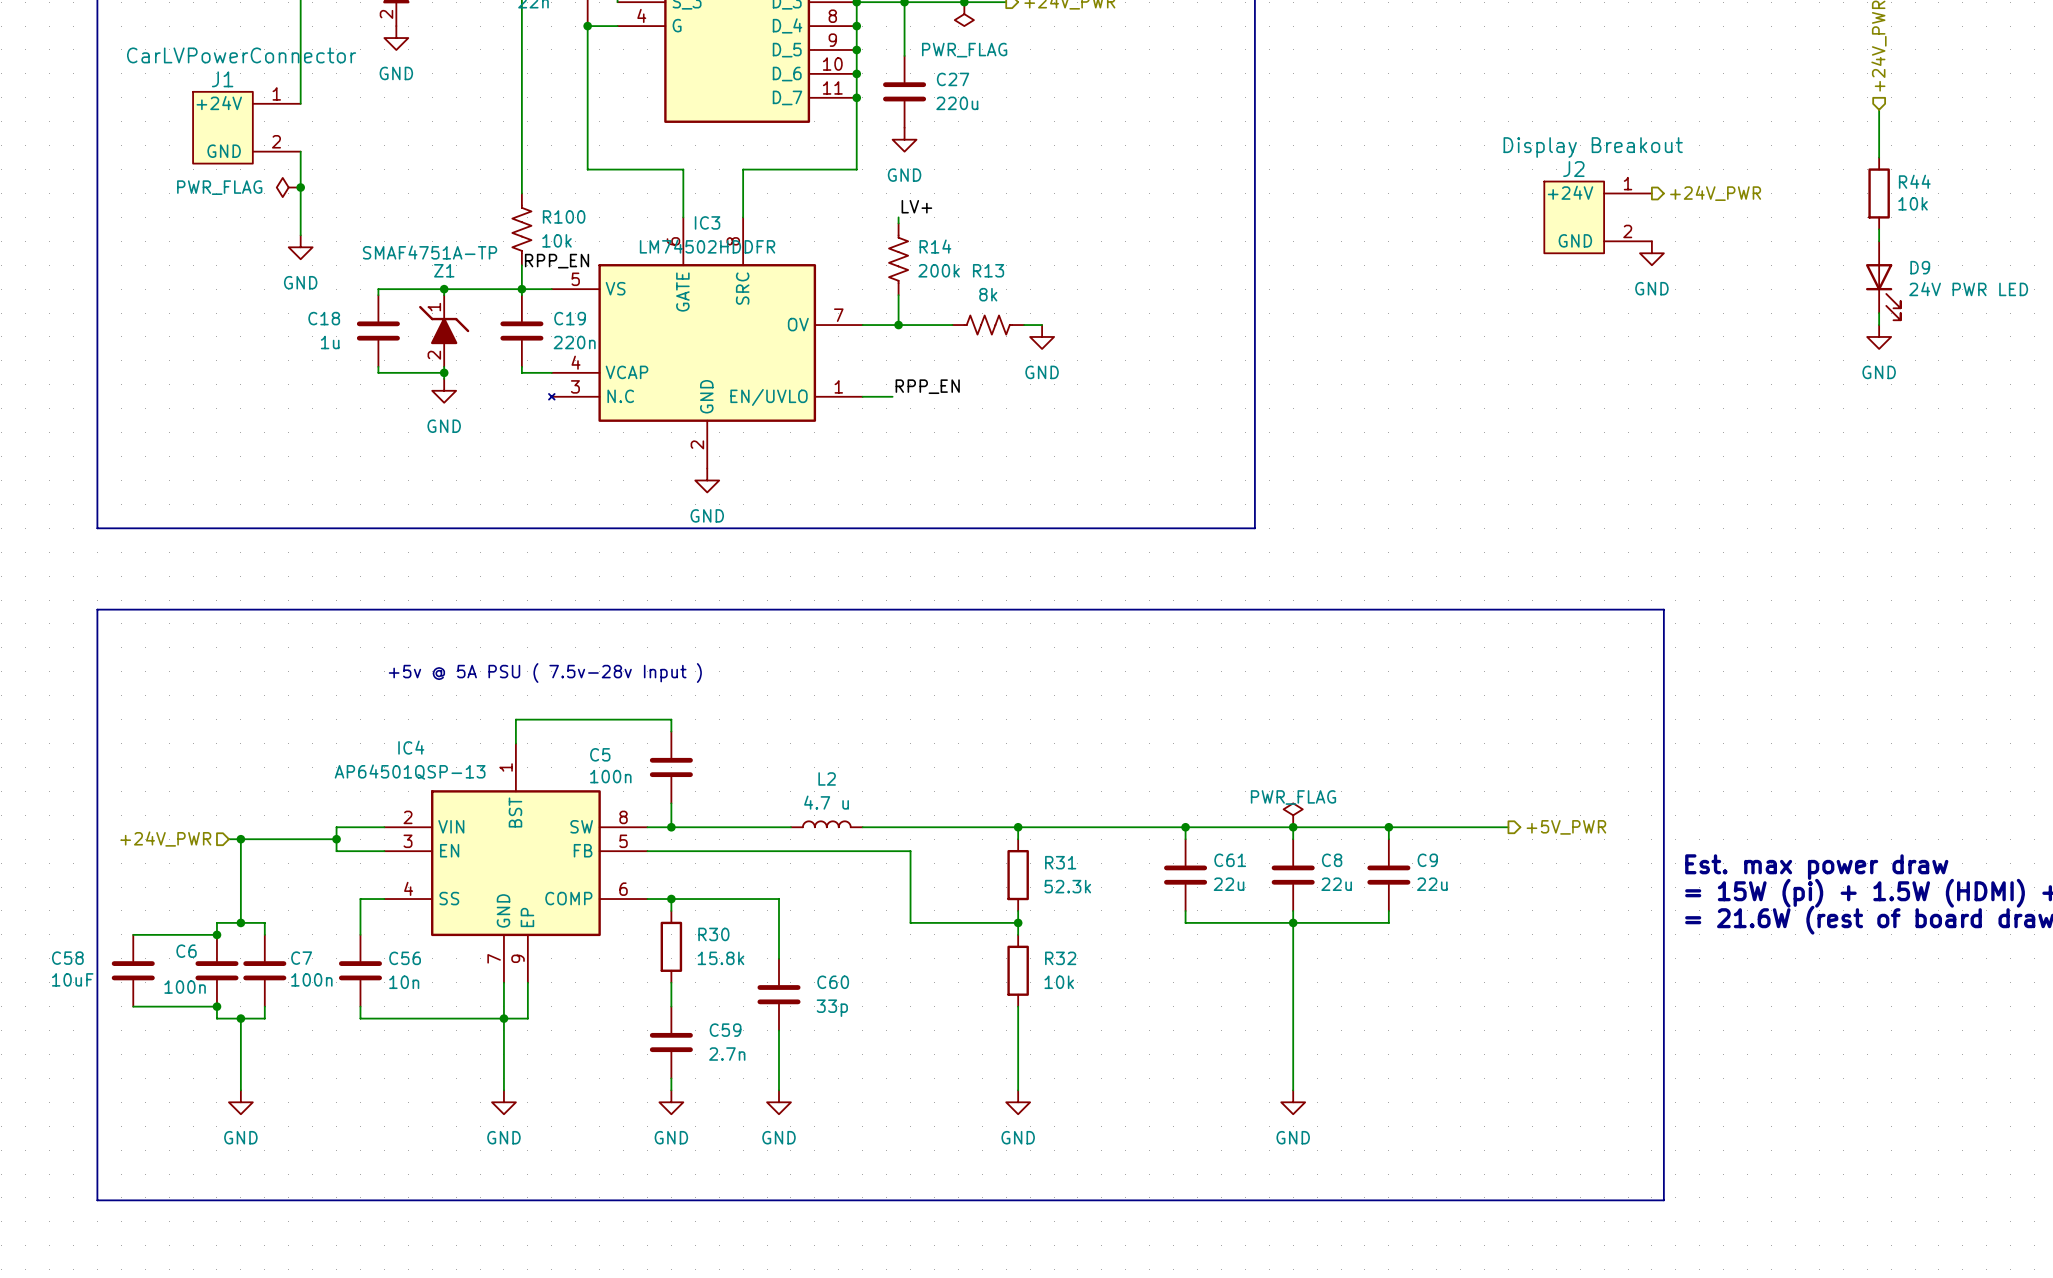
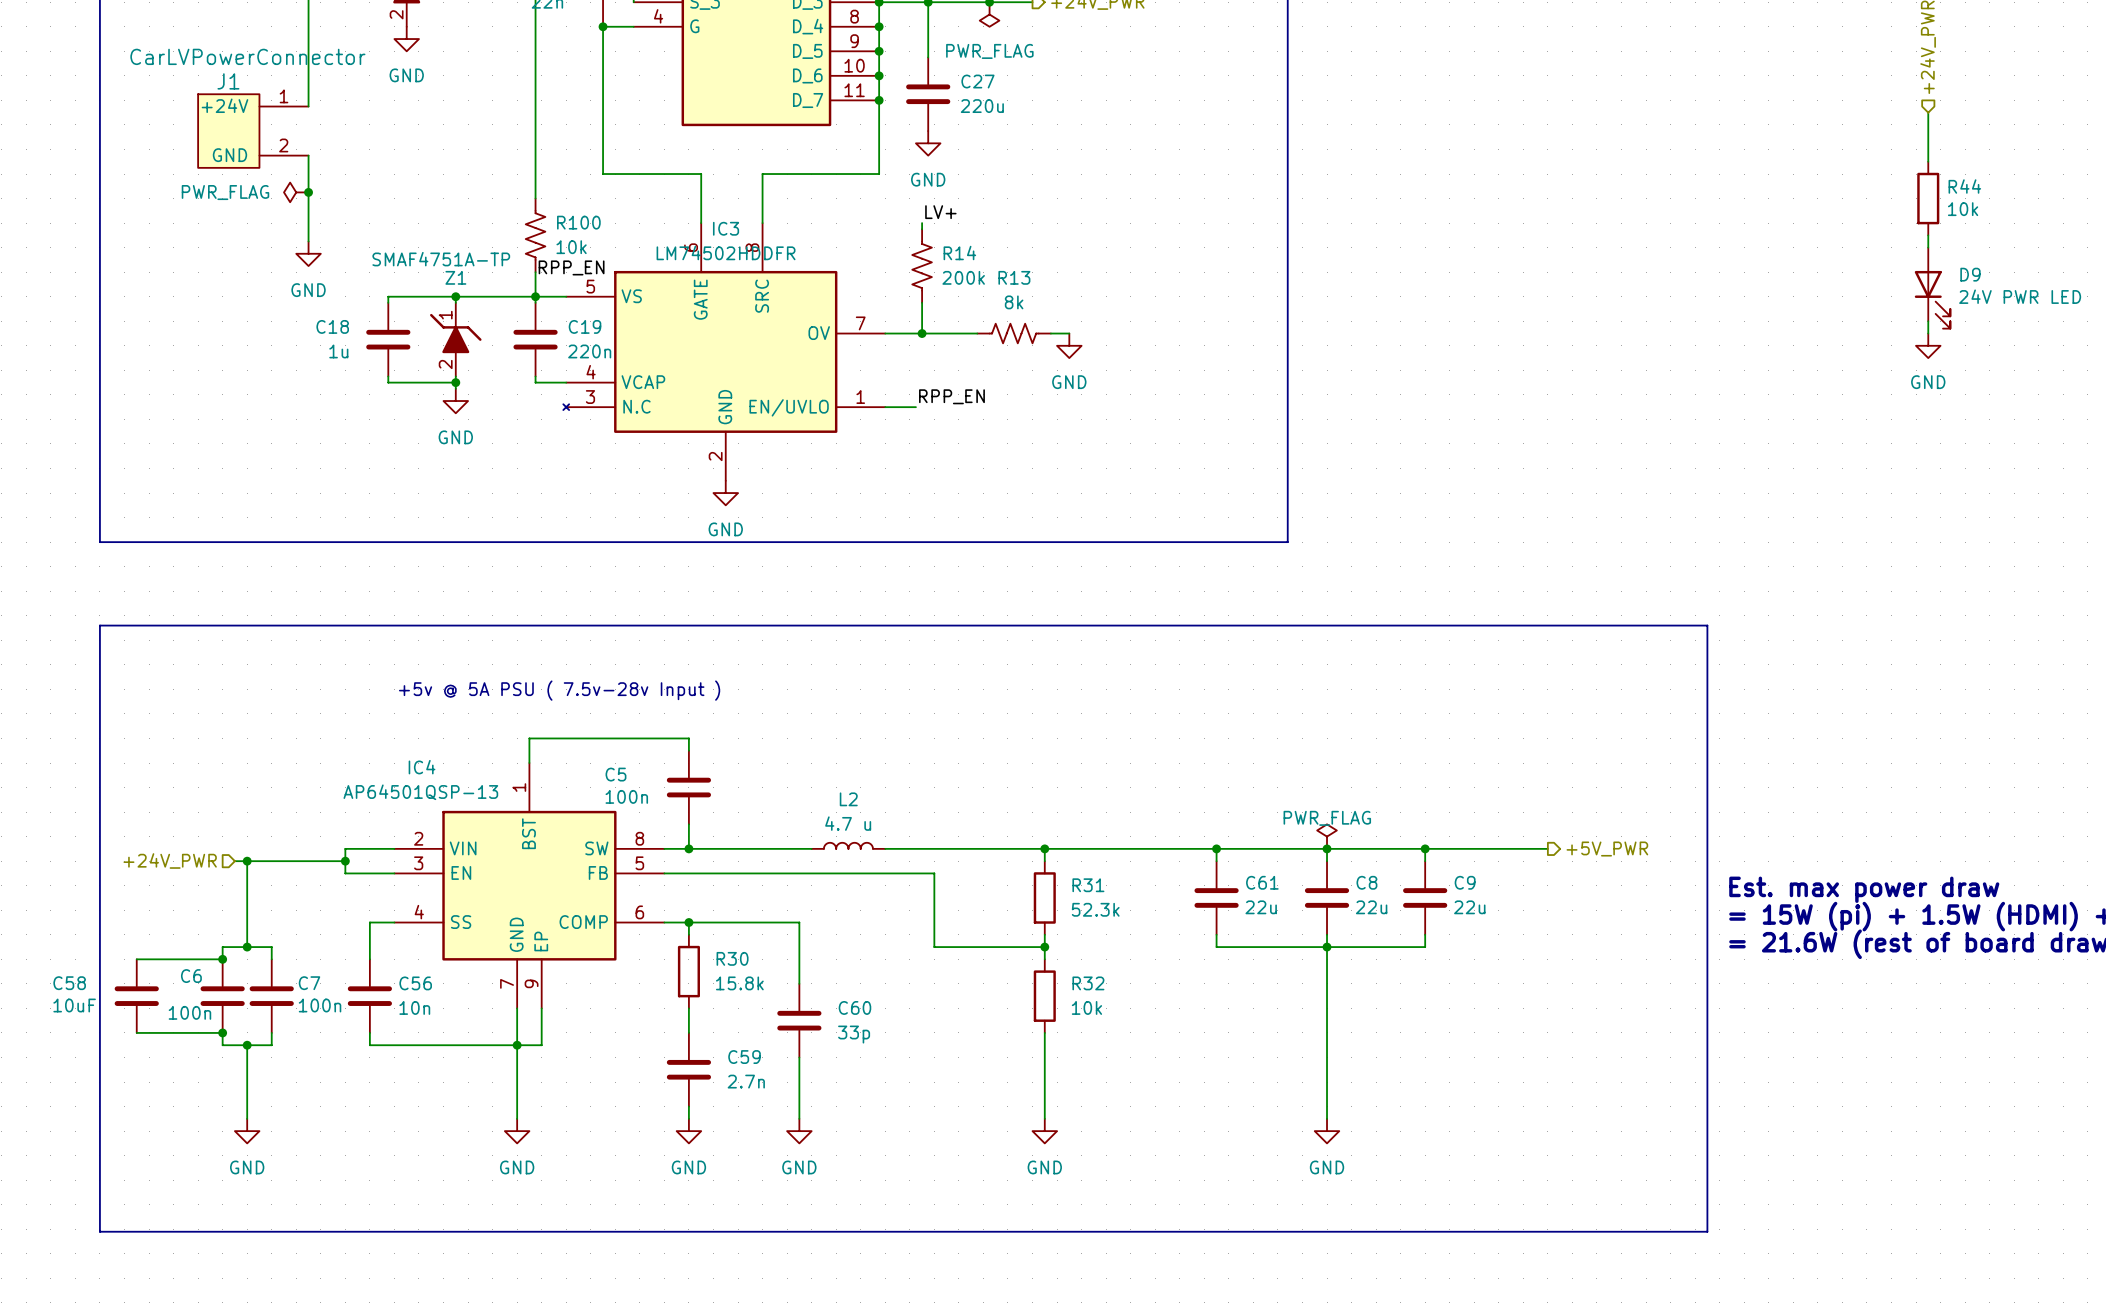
hierarchical label: +24V_PWR (1715, 193) -> none
J2: Display Breakout (1598, 217) -> none
power symbol: GND (1651, 253) -> none

